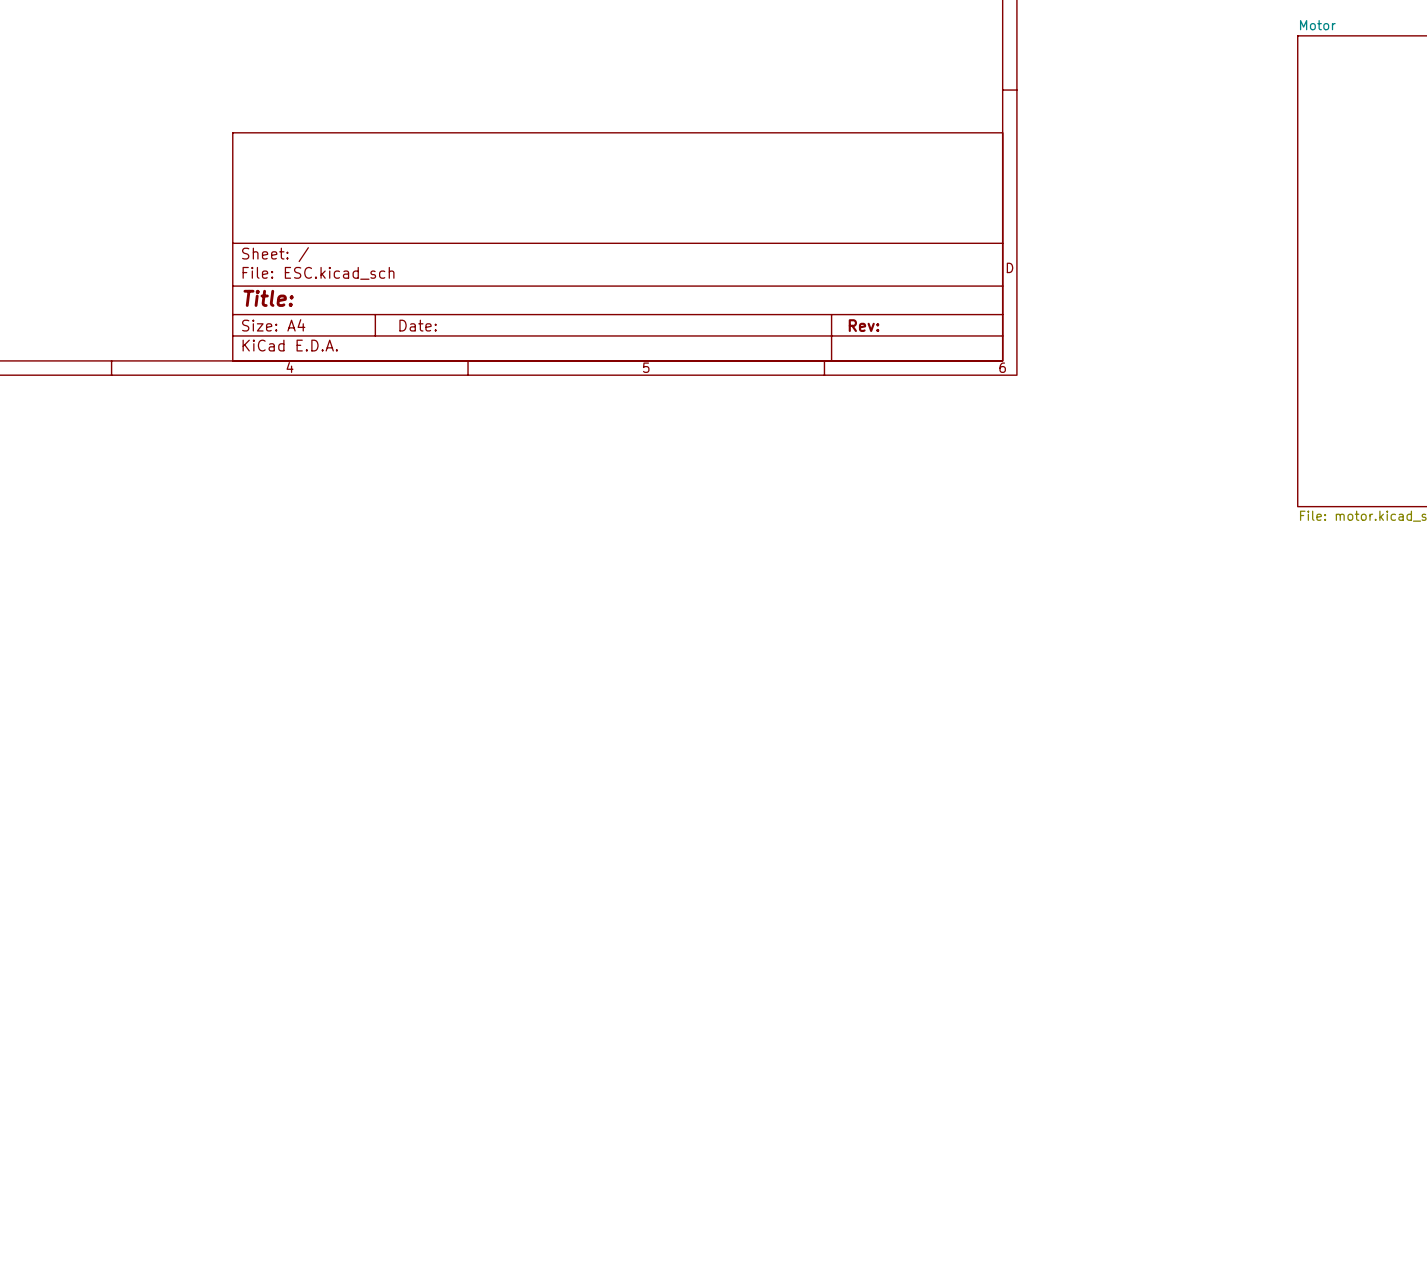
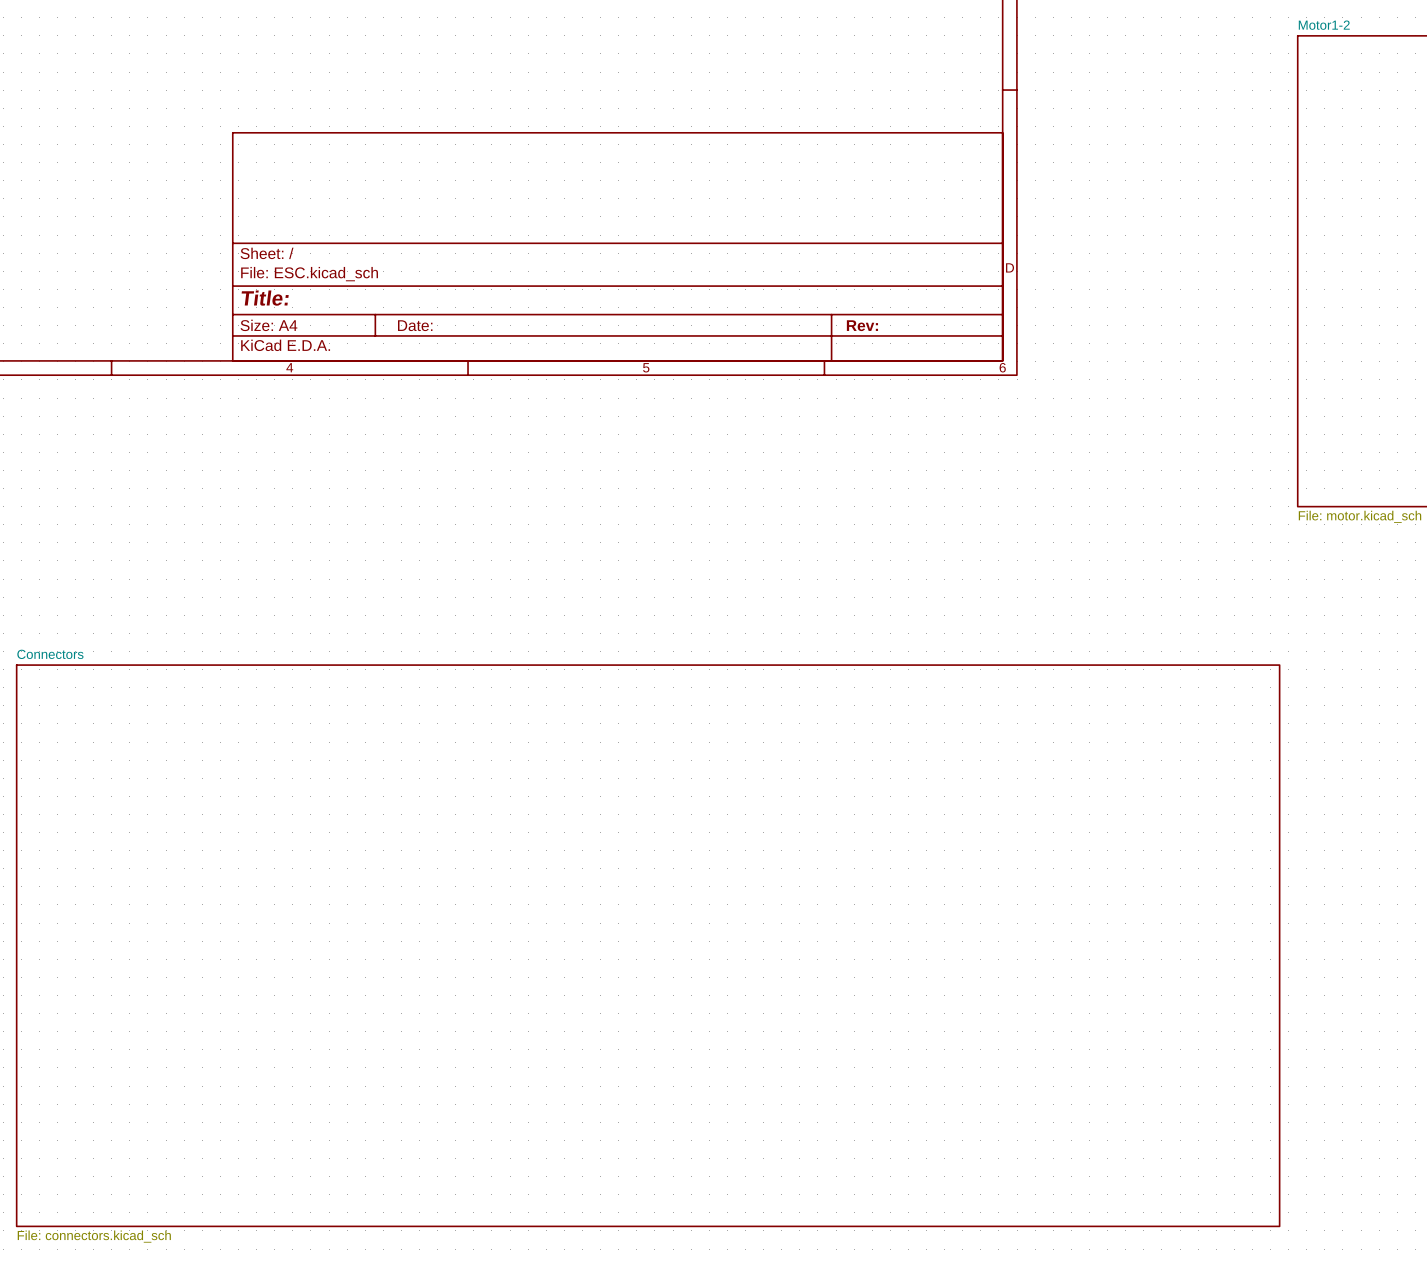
sheet Motor name: Motor (1317, 25) -> Motor1-2 (1324, 25)
sheet Connectors: none -> File: connectors.kicad_sch (648, 945)

